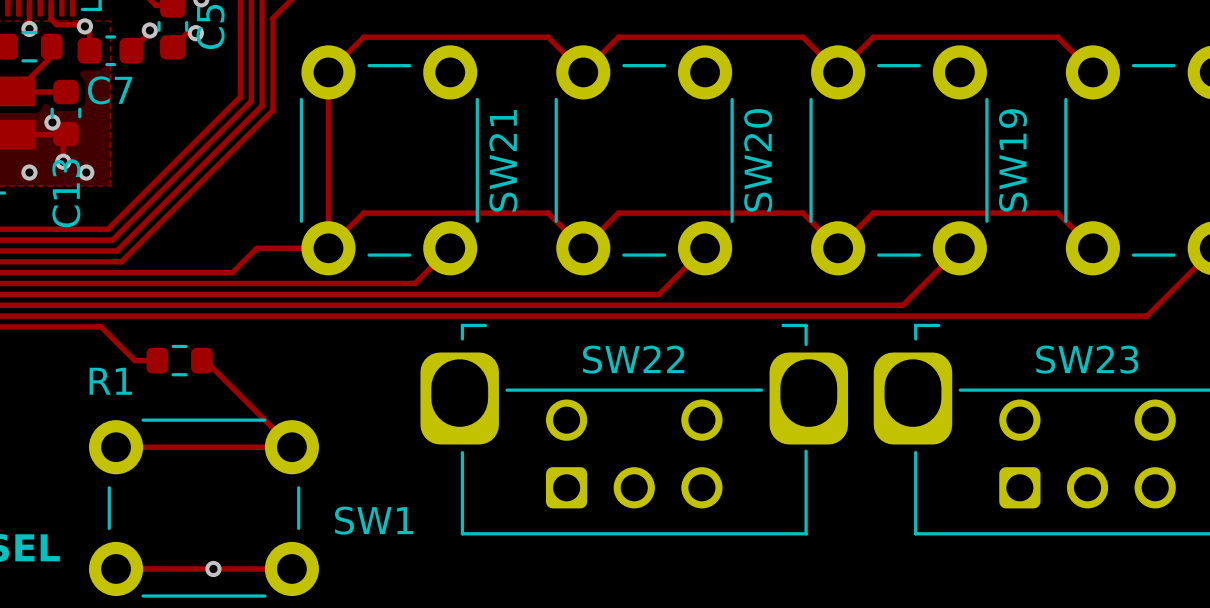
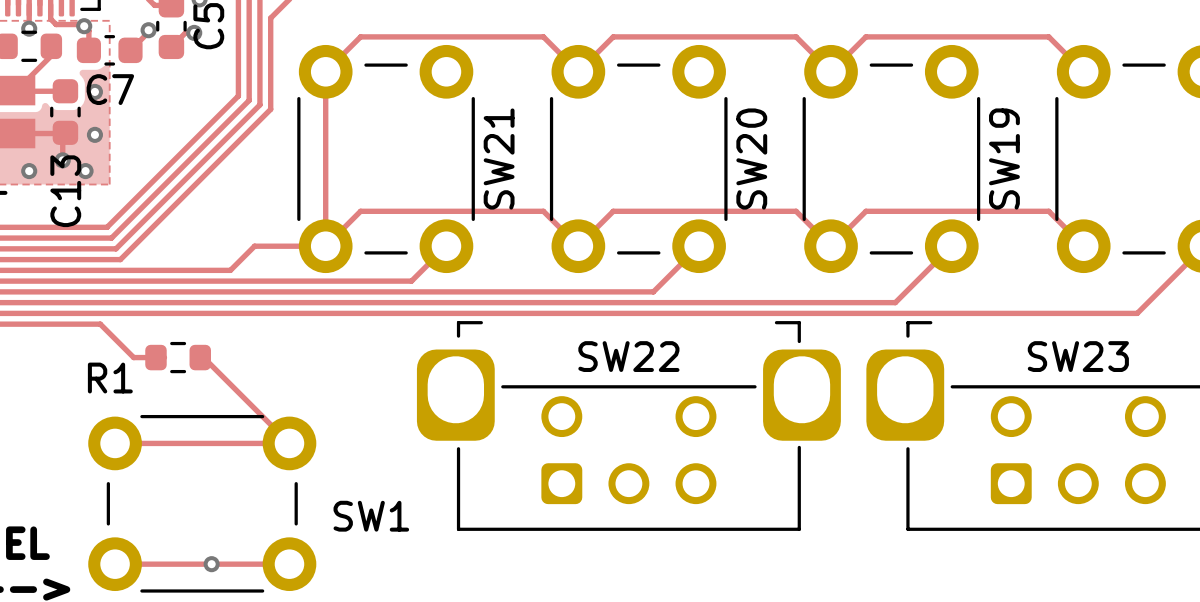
via: none -> (94, 91)
via: (52, 122) -> none
via: none -> (94, 134)

